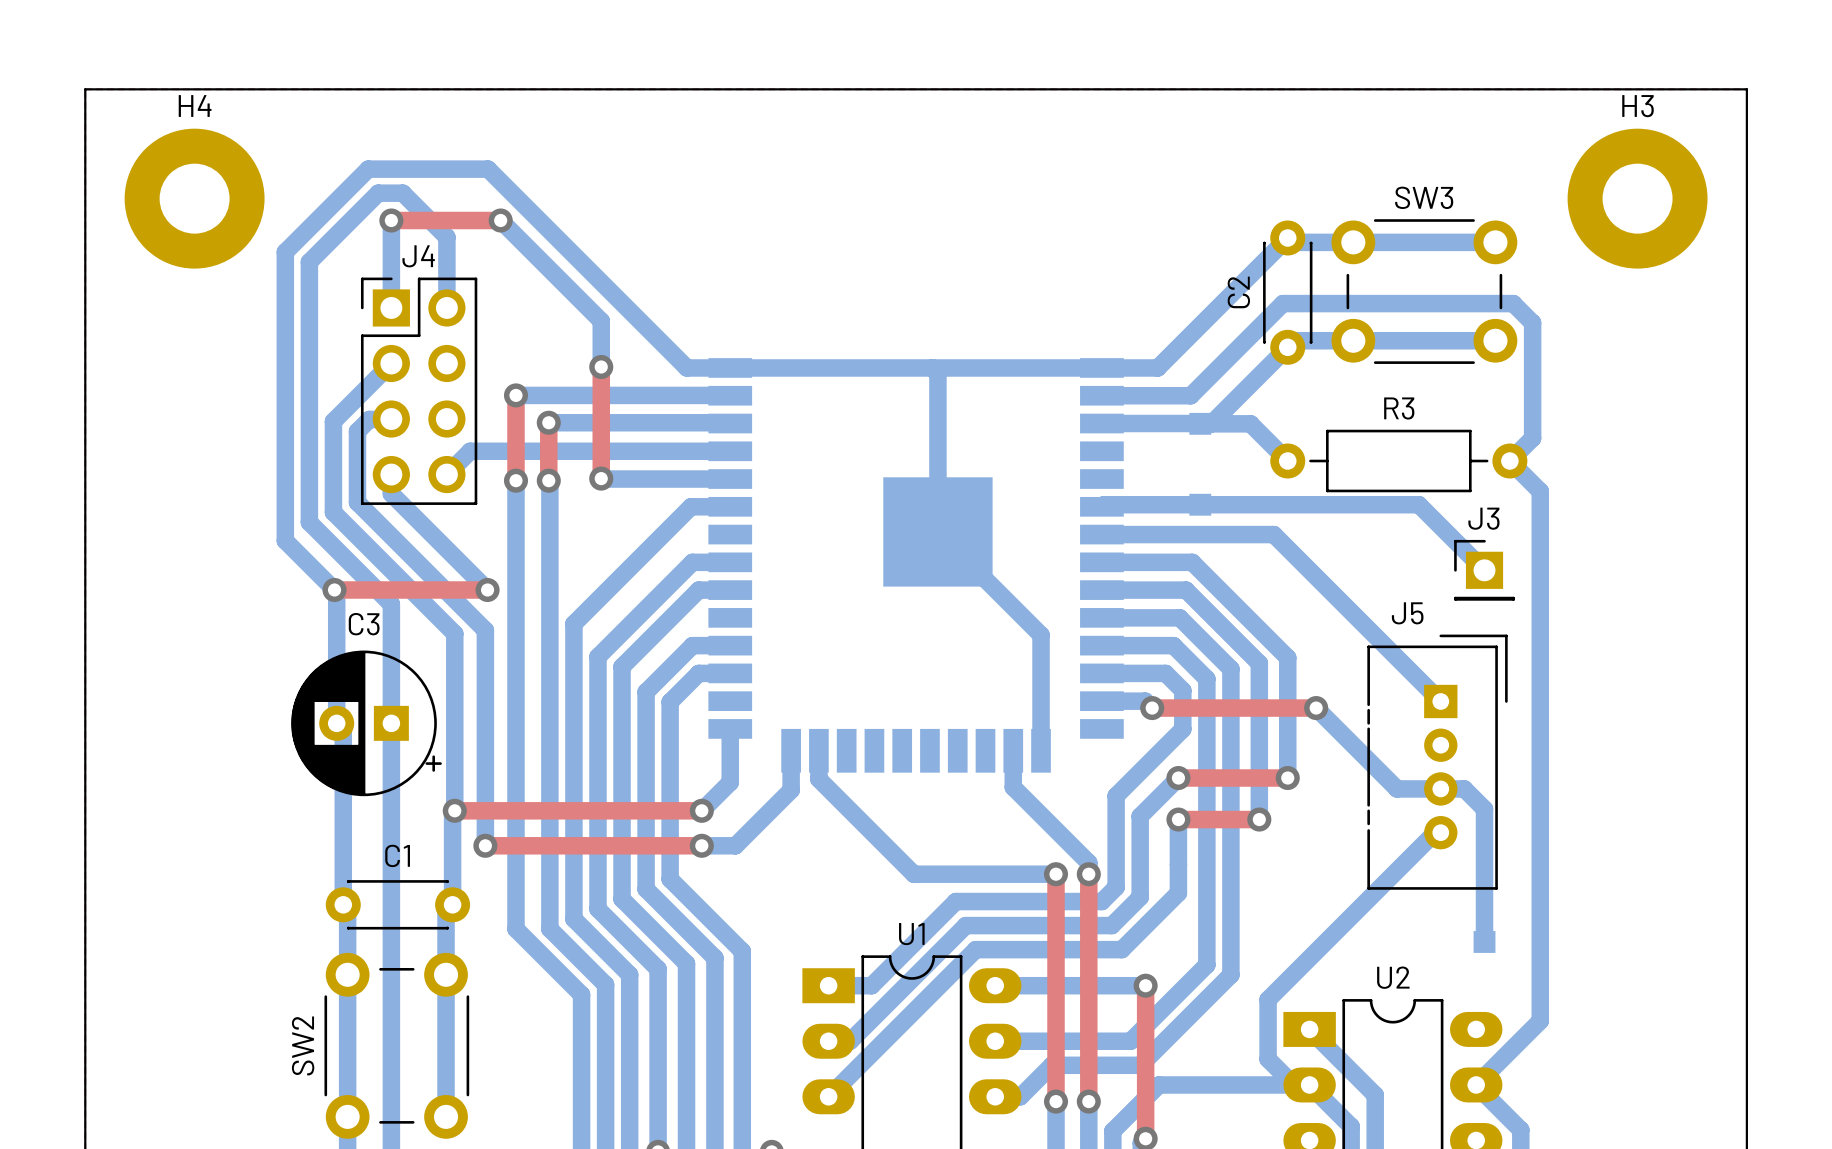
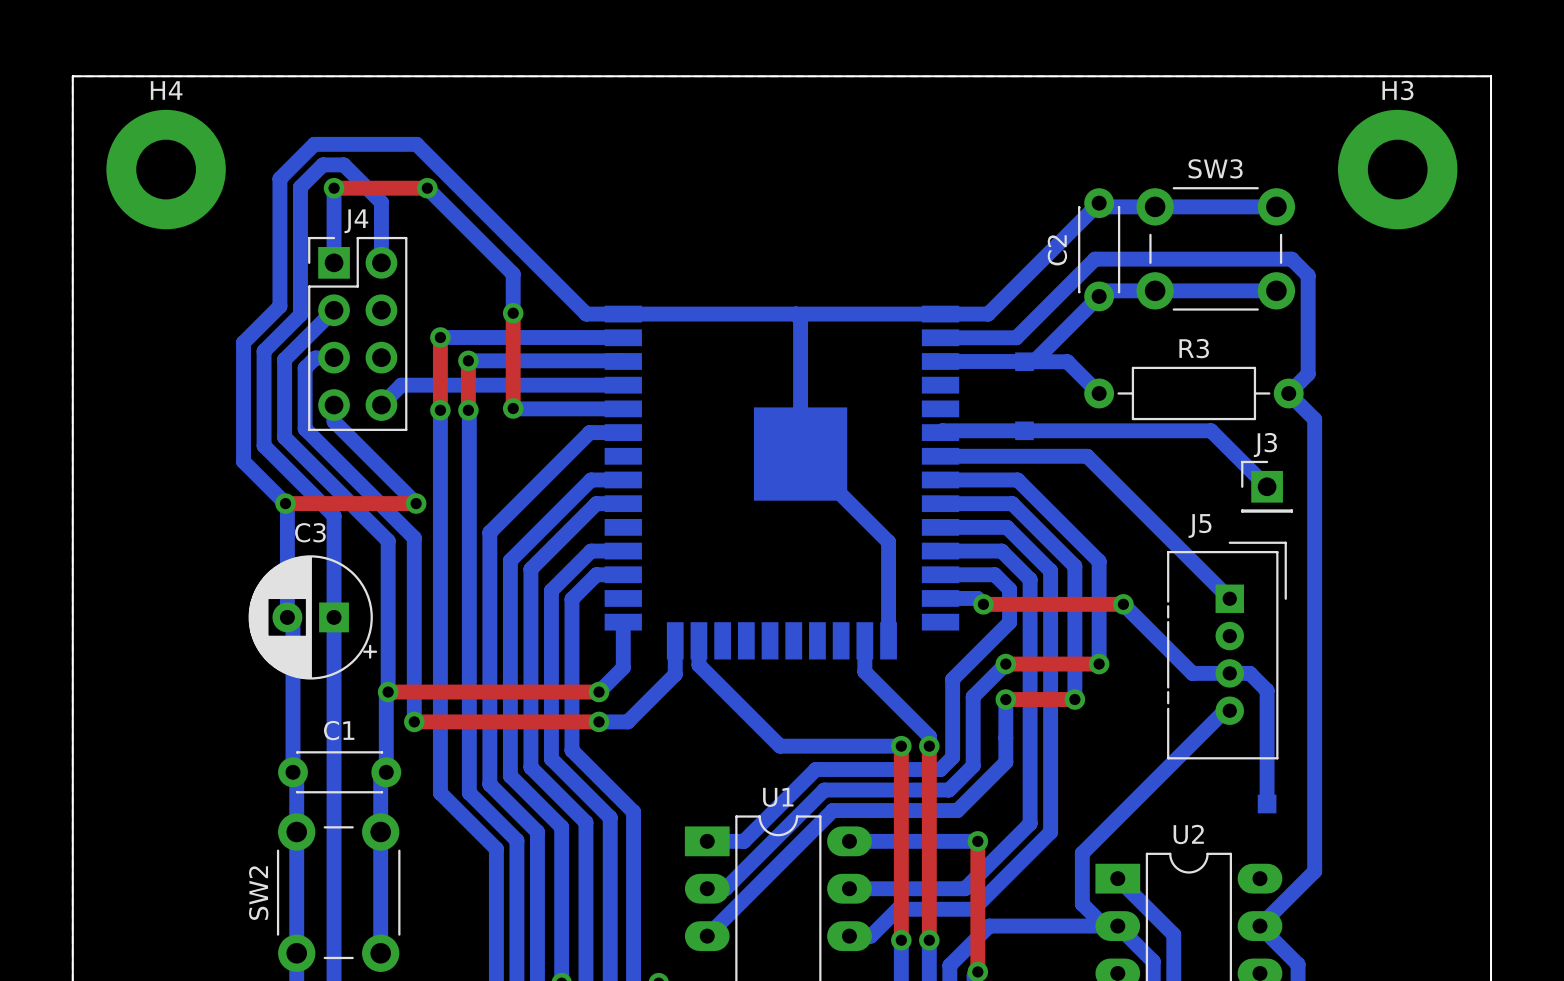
bottom track: (327, 209) (285, 252) (285, 401) -> (279, 178) (279, 306) (243, 342)
bottom track: (352, 219) (309, 262) (309, 411) -> (300, 187) (300, 314) (264, 351)

